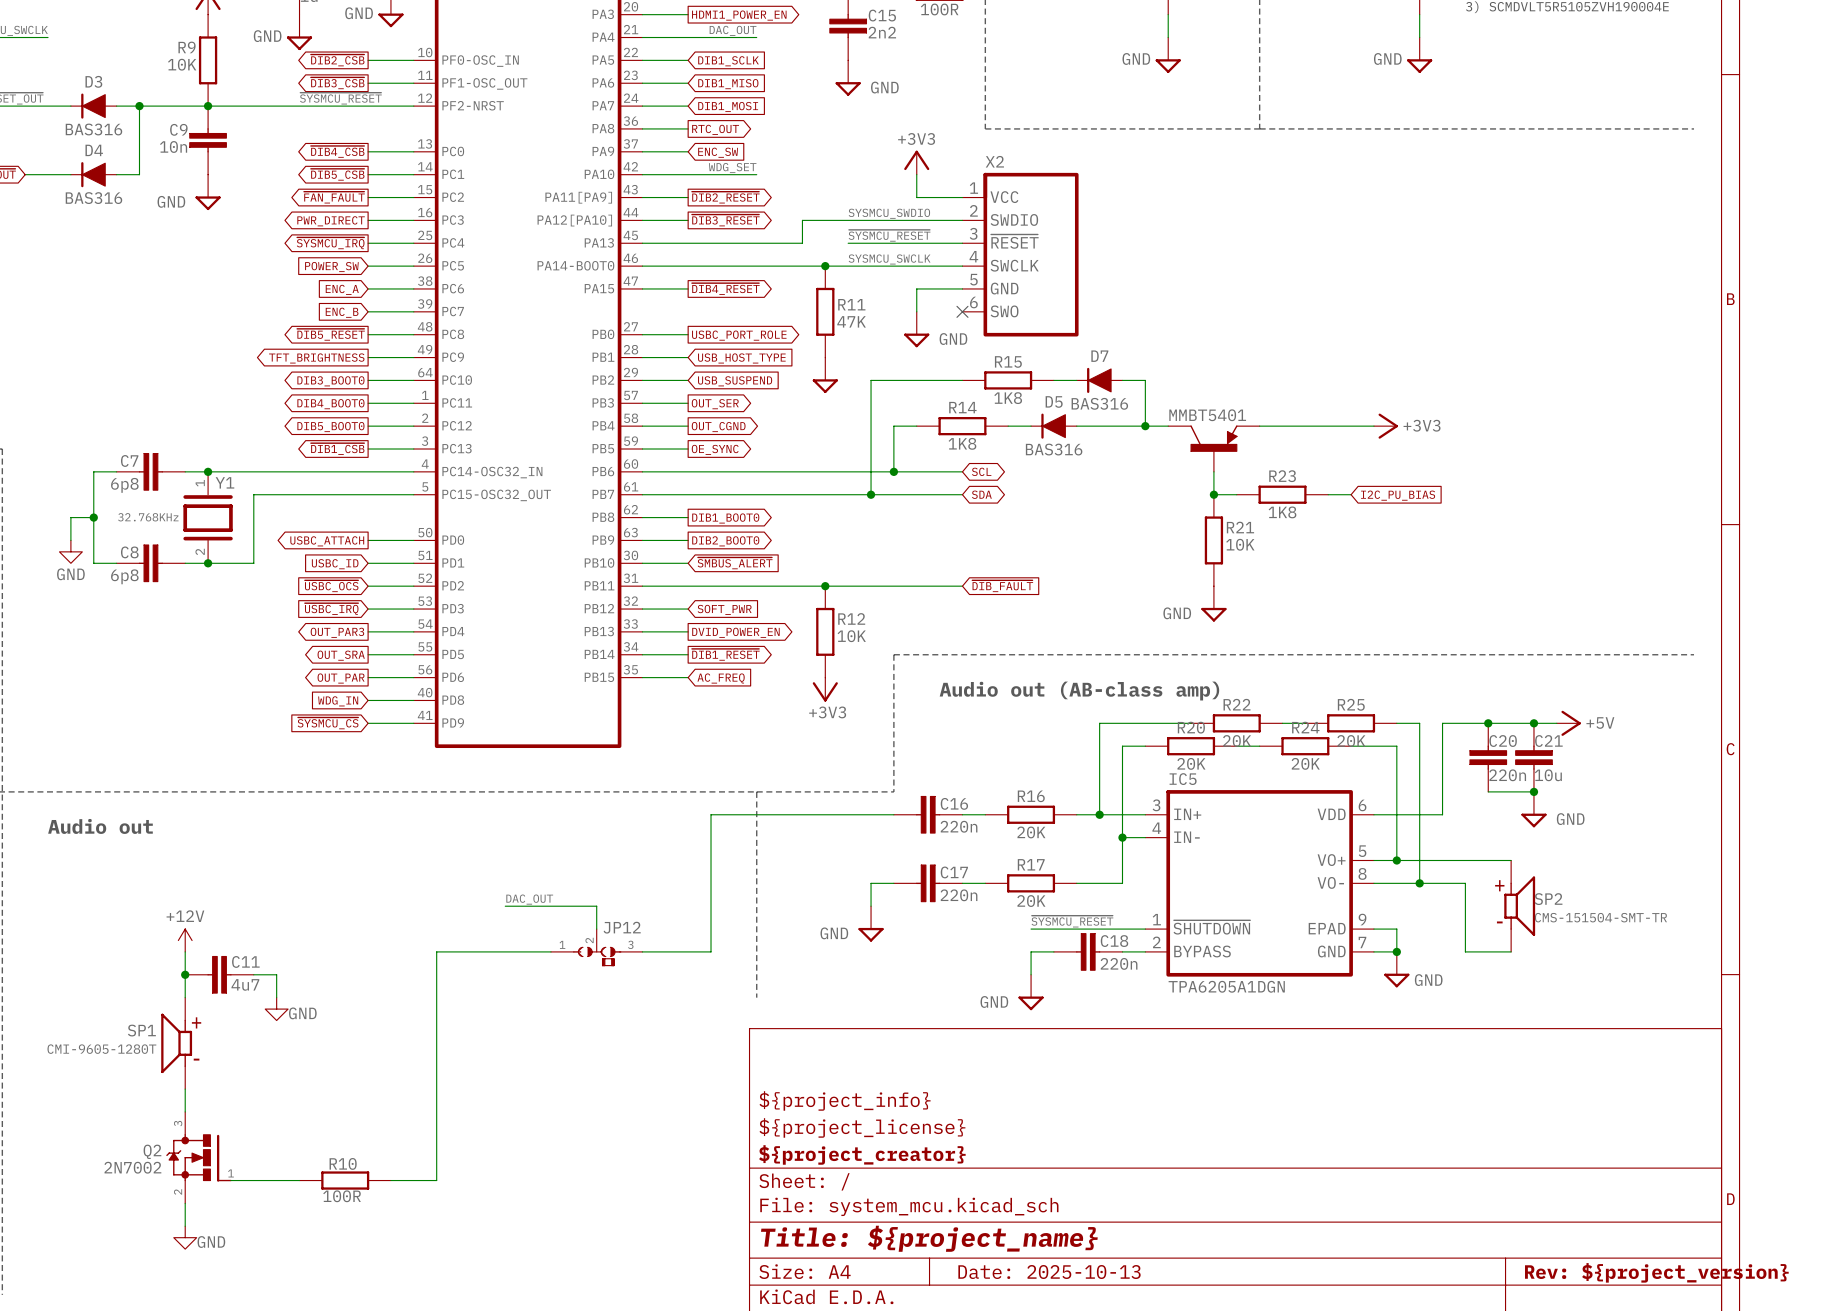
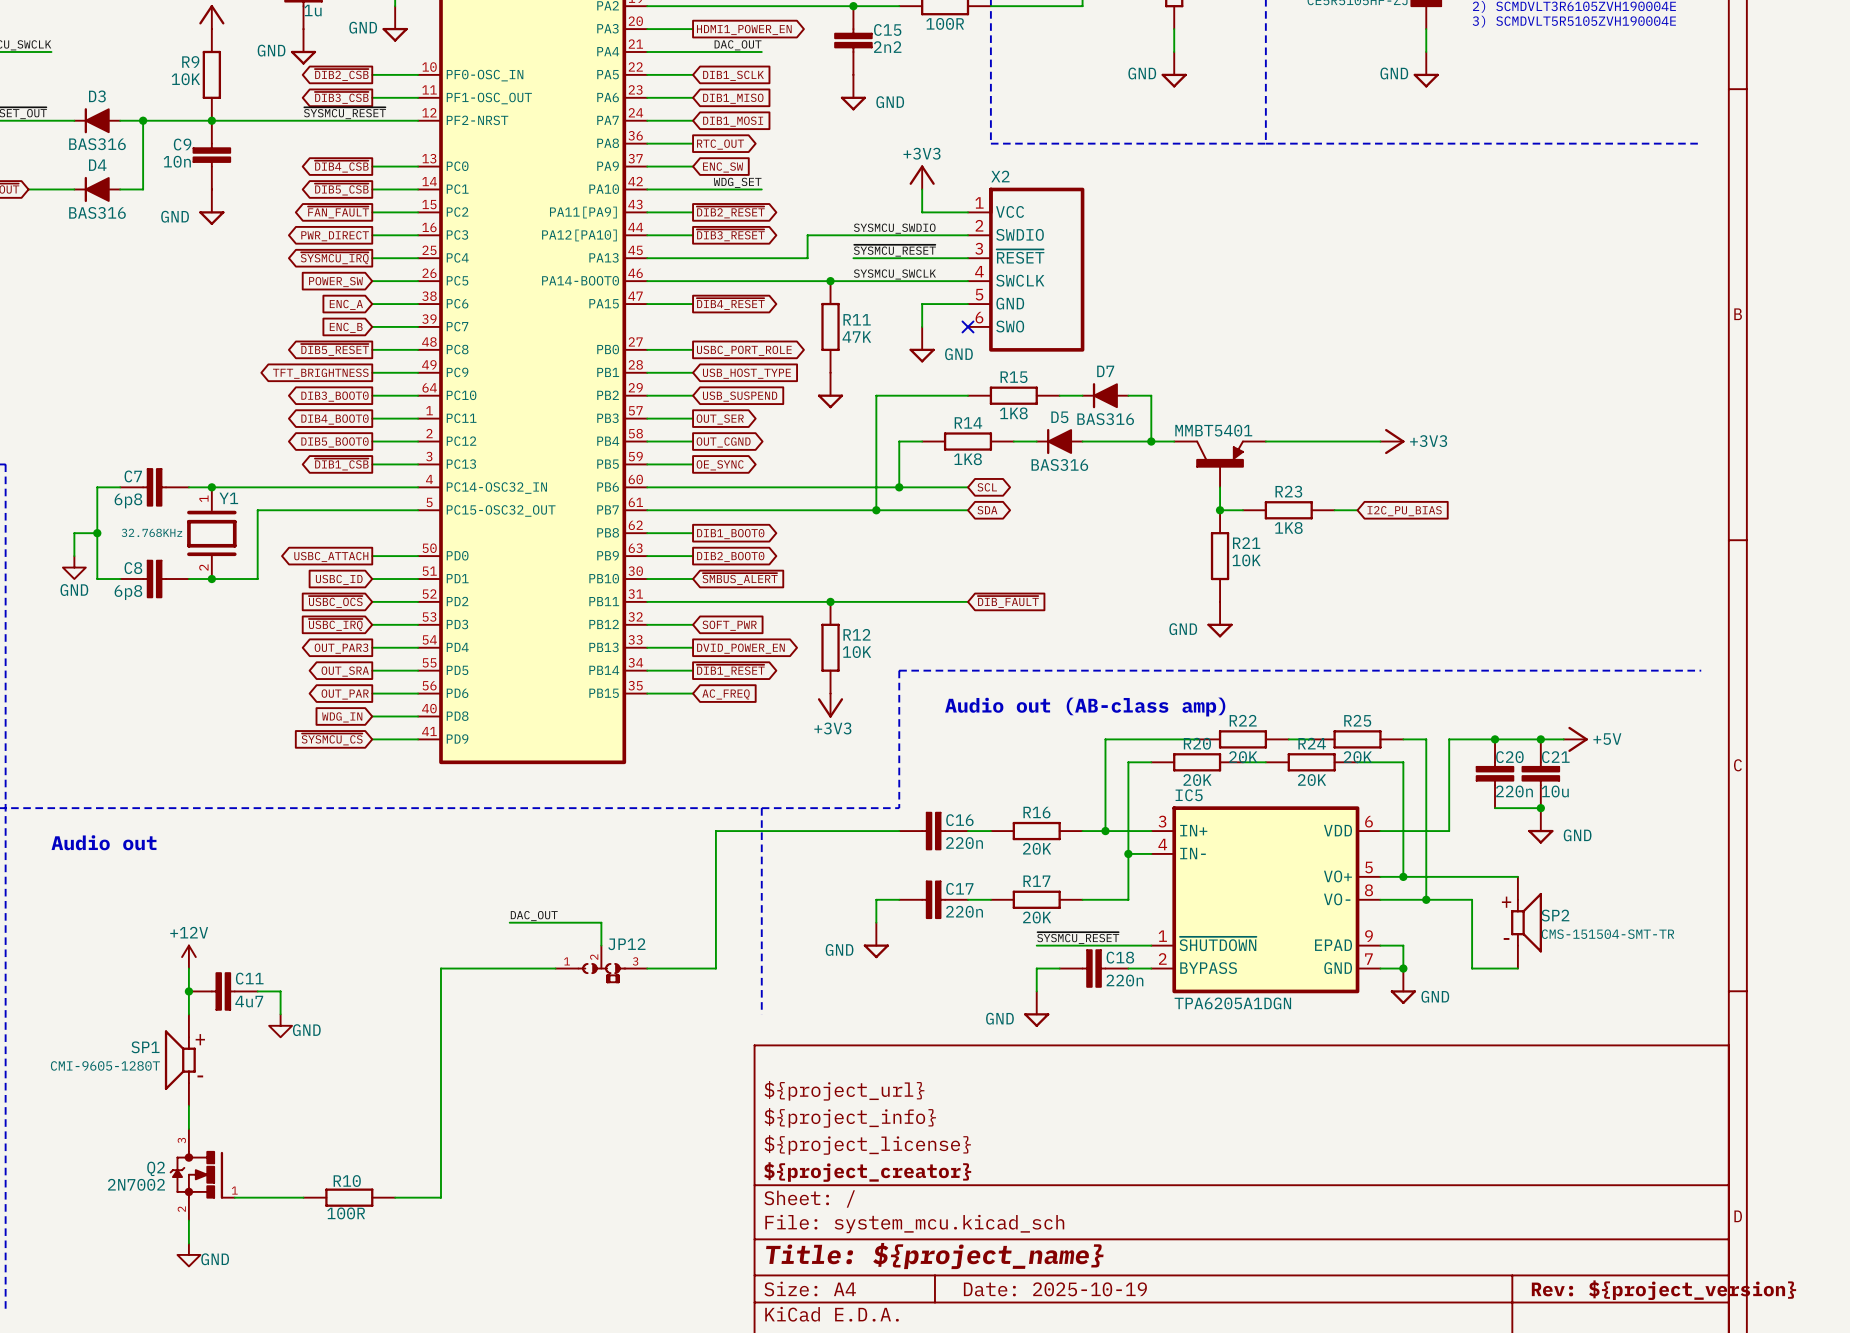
title block: none -> ${project_url} (844, 1090)
title block: Date: 2025-10-13 (1049, 1272) -> Date: 2025-10-19 (1055, 1289)

